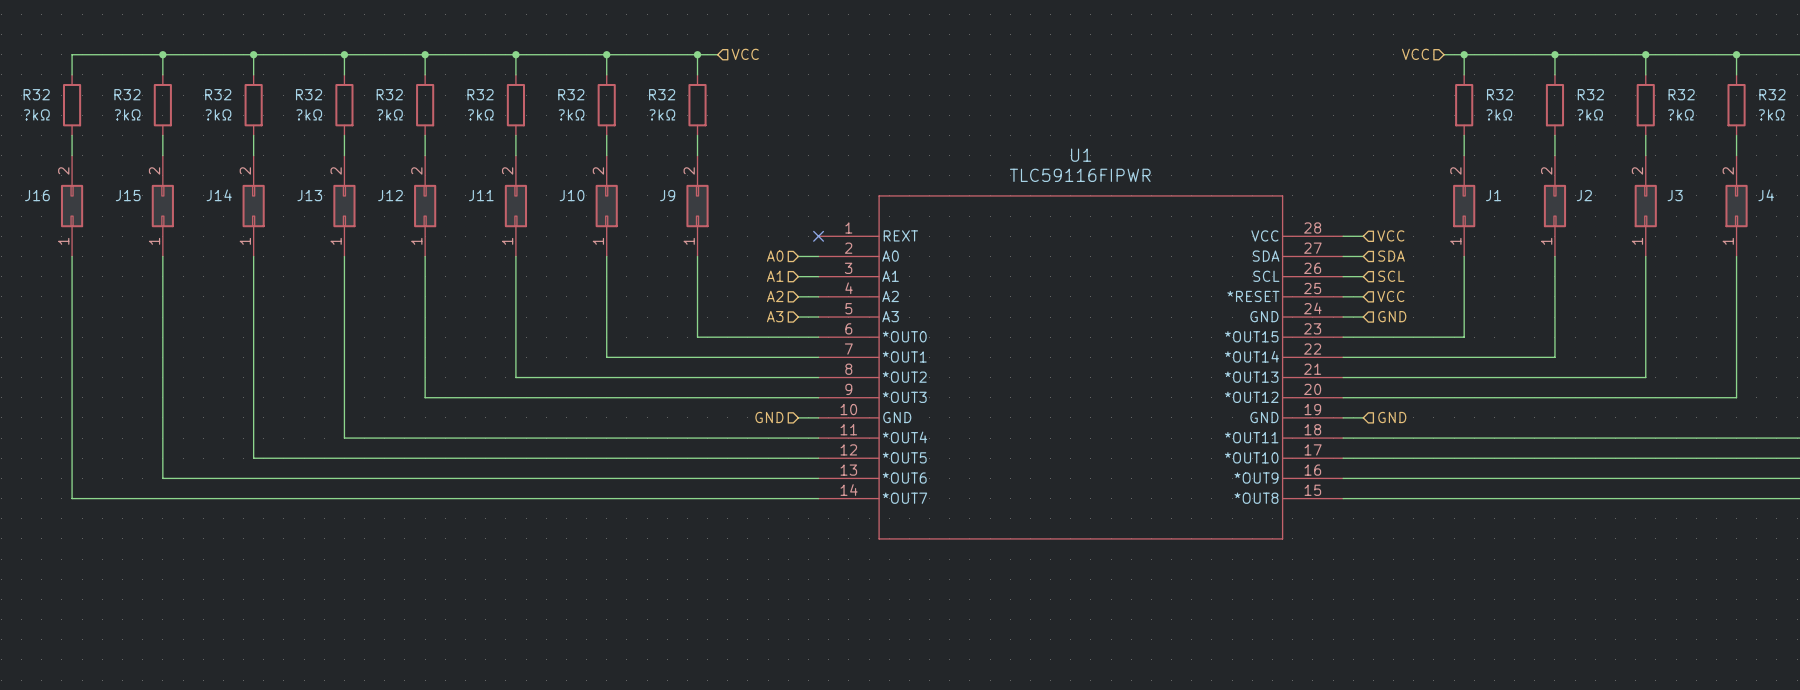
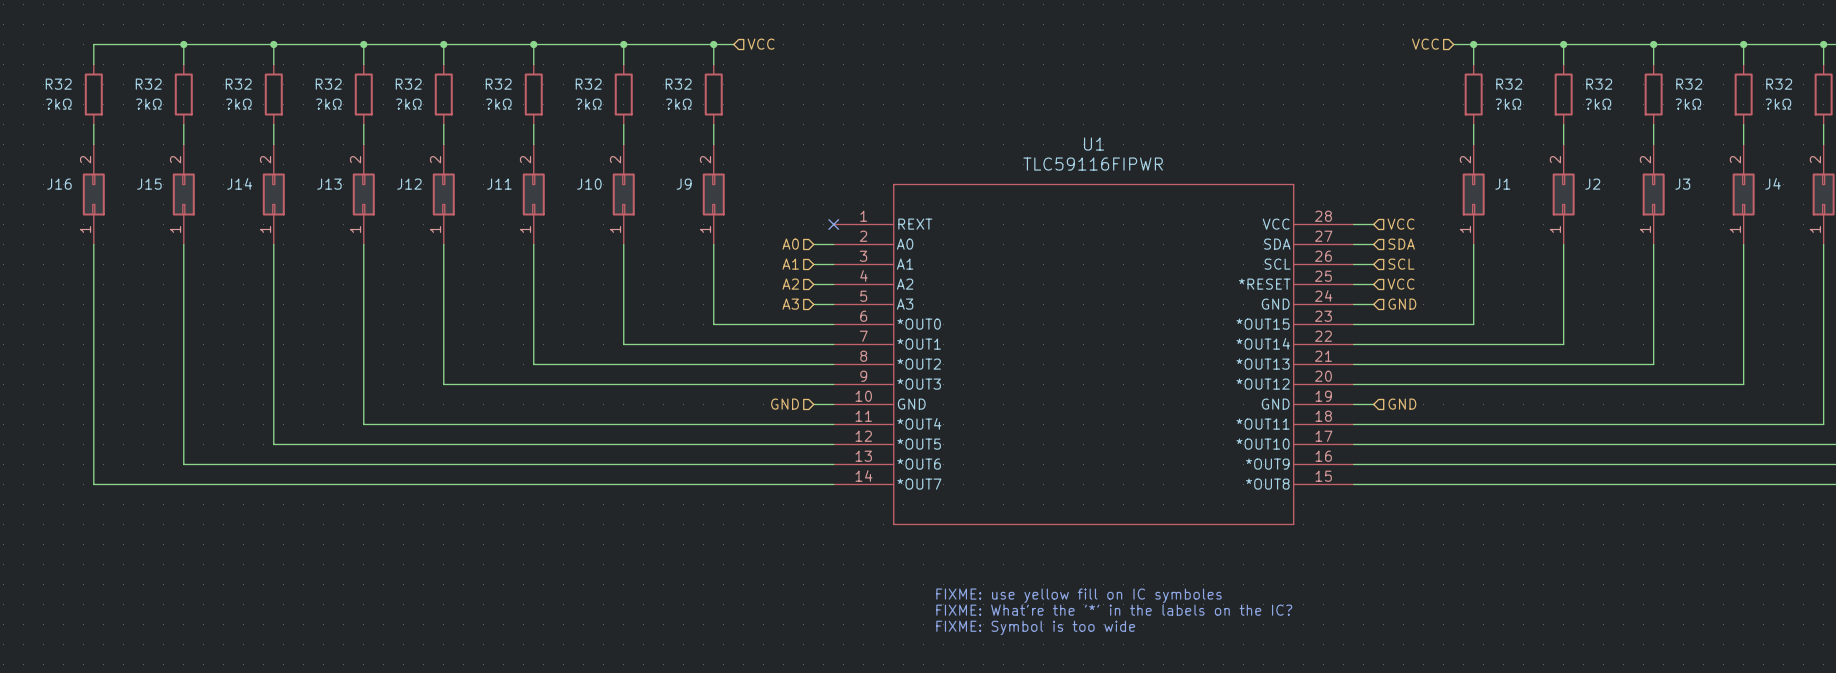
text: none -> FIXME: use yellow fill on IC symboles (1079, 595)
text: none -> FIXME: What're the '*' in the labels on the IC? (1114, 610)
text: none -> FIXME: Symbol is too wide (1035, 627)

